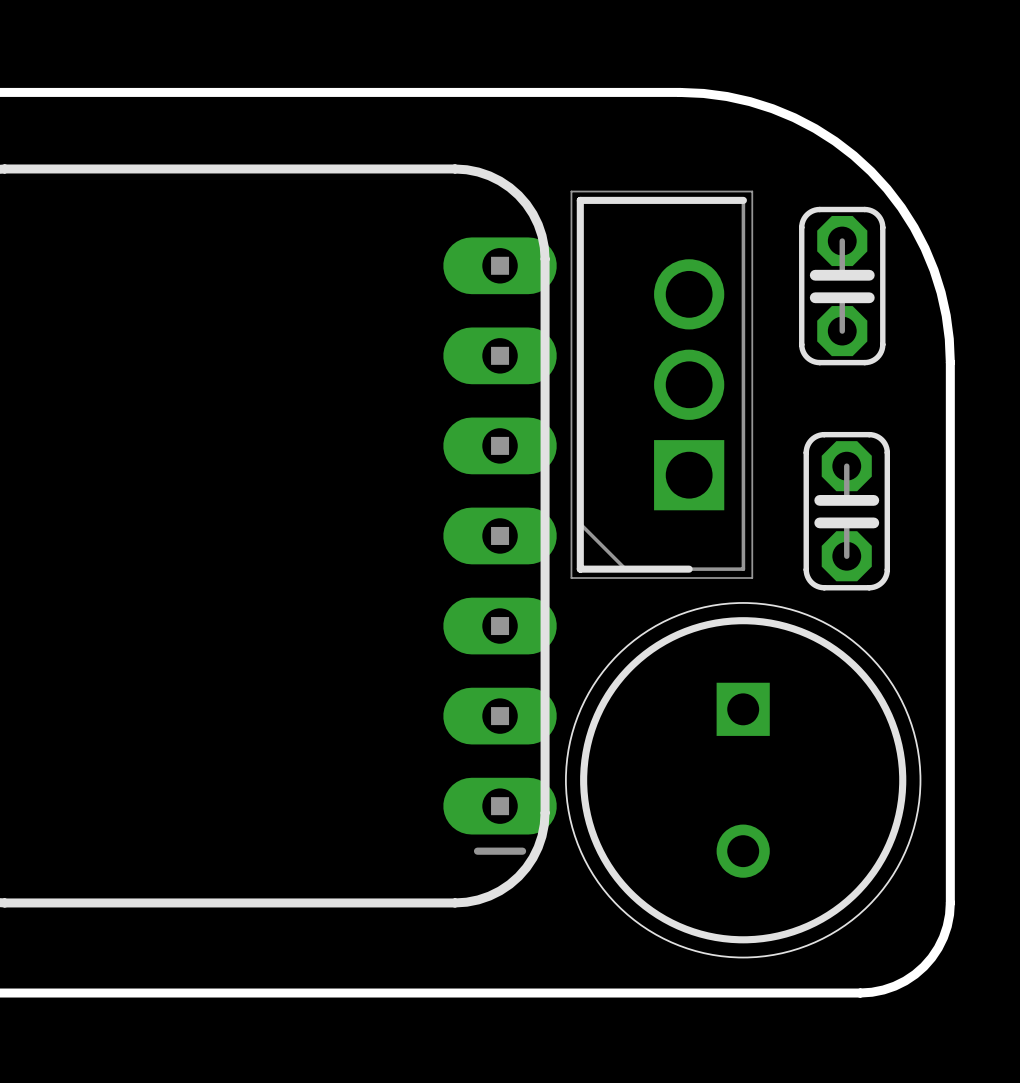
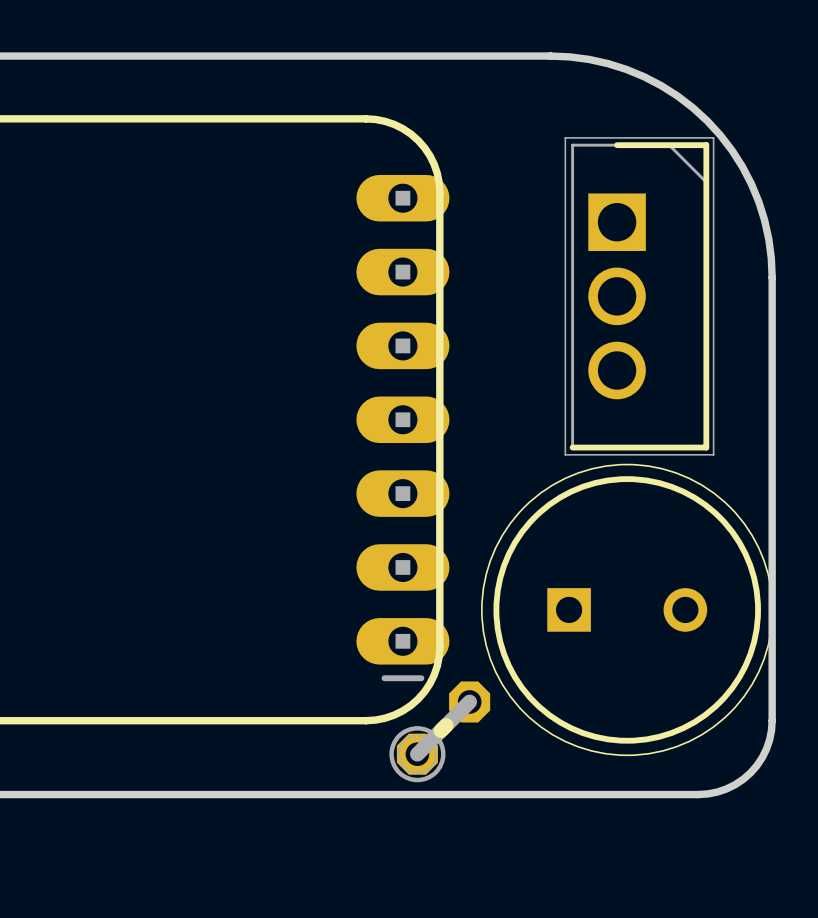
part: (842, 286) -> none
part rotation: 0° (661, 384) -> 180° (639, 296)
part: (846, 511) -> none
part rotation: 0° (743, 780) -> 90° counterclockwise (627, 609)
part: none -> (439, 731)

